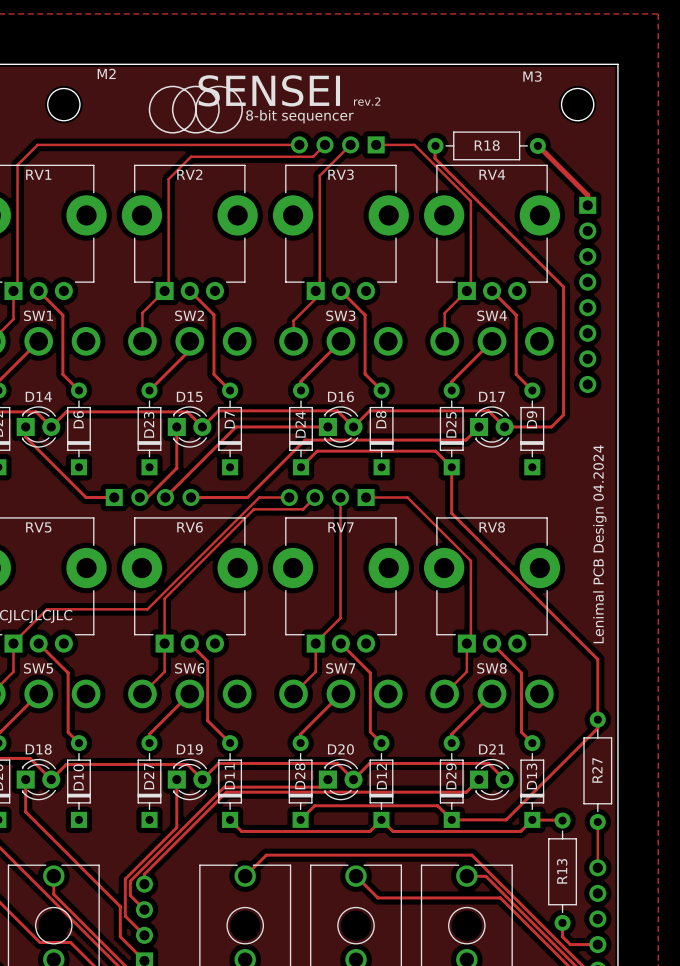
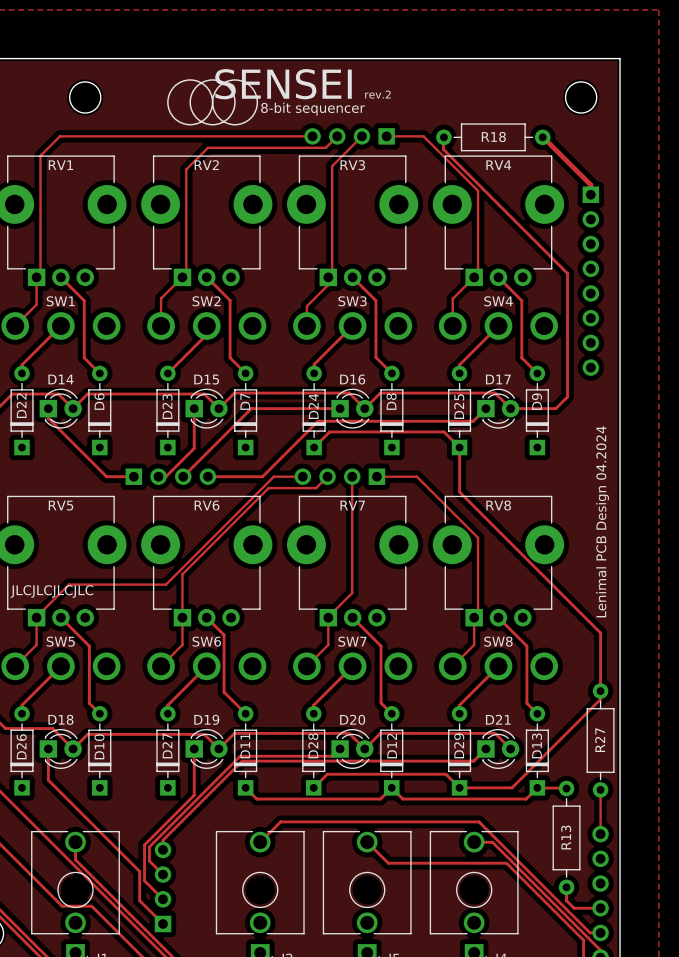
M2 name: M2 (106, 73) -> none
M3 name: M3 (532, 76) -> none

